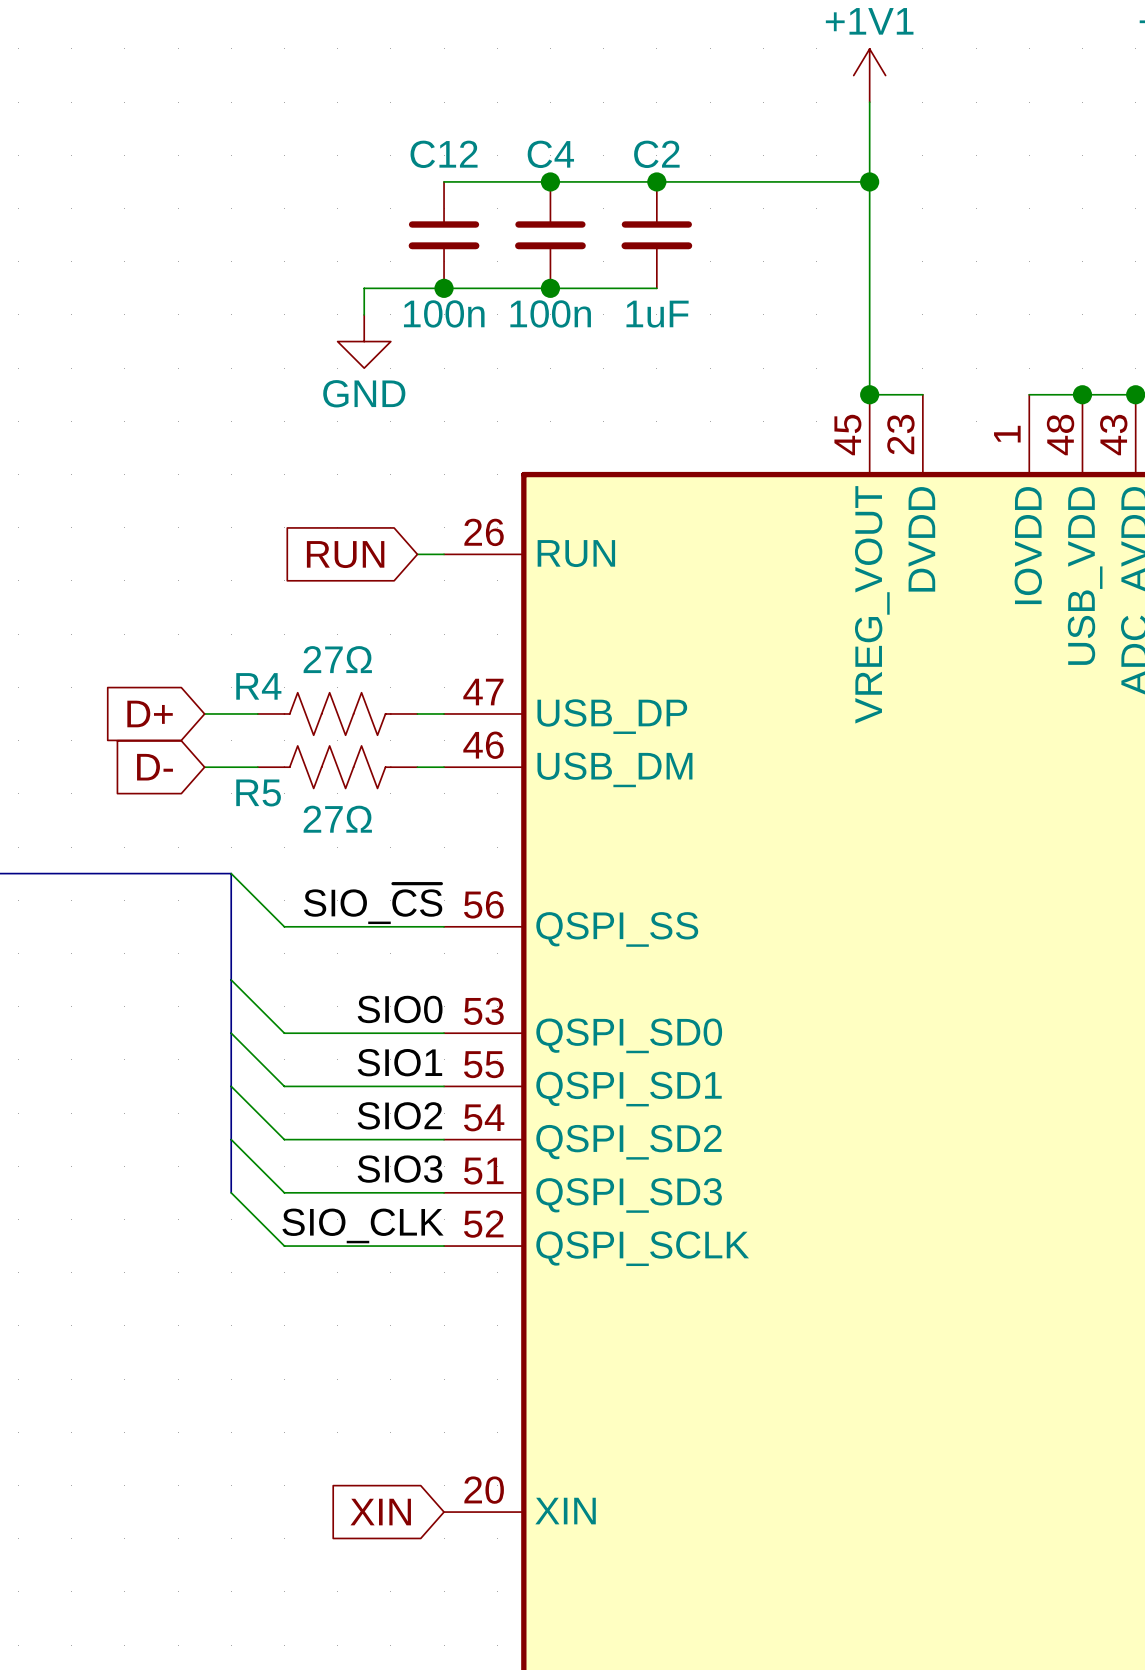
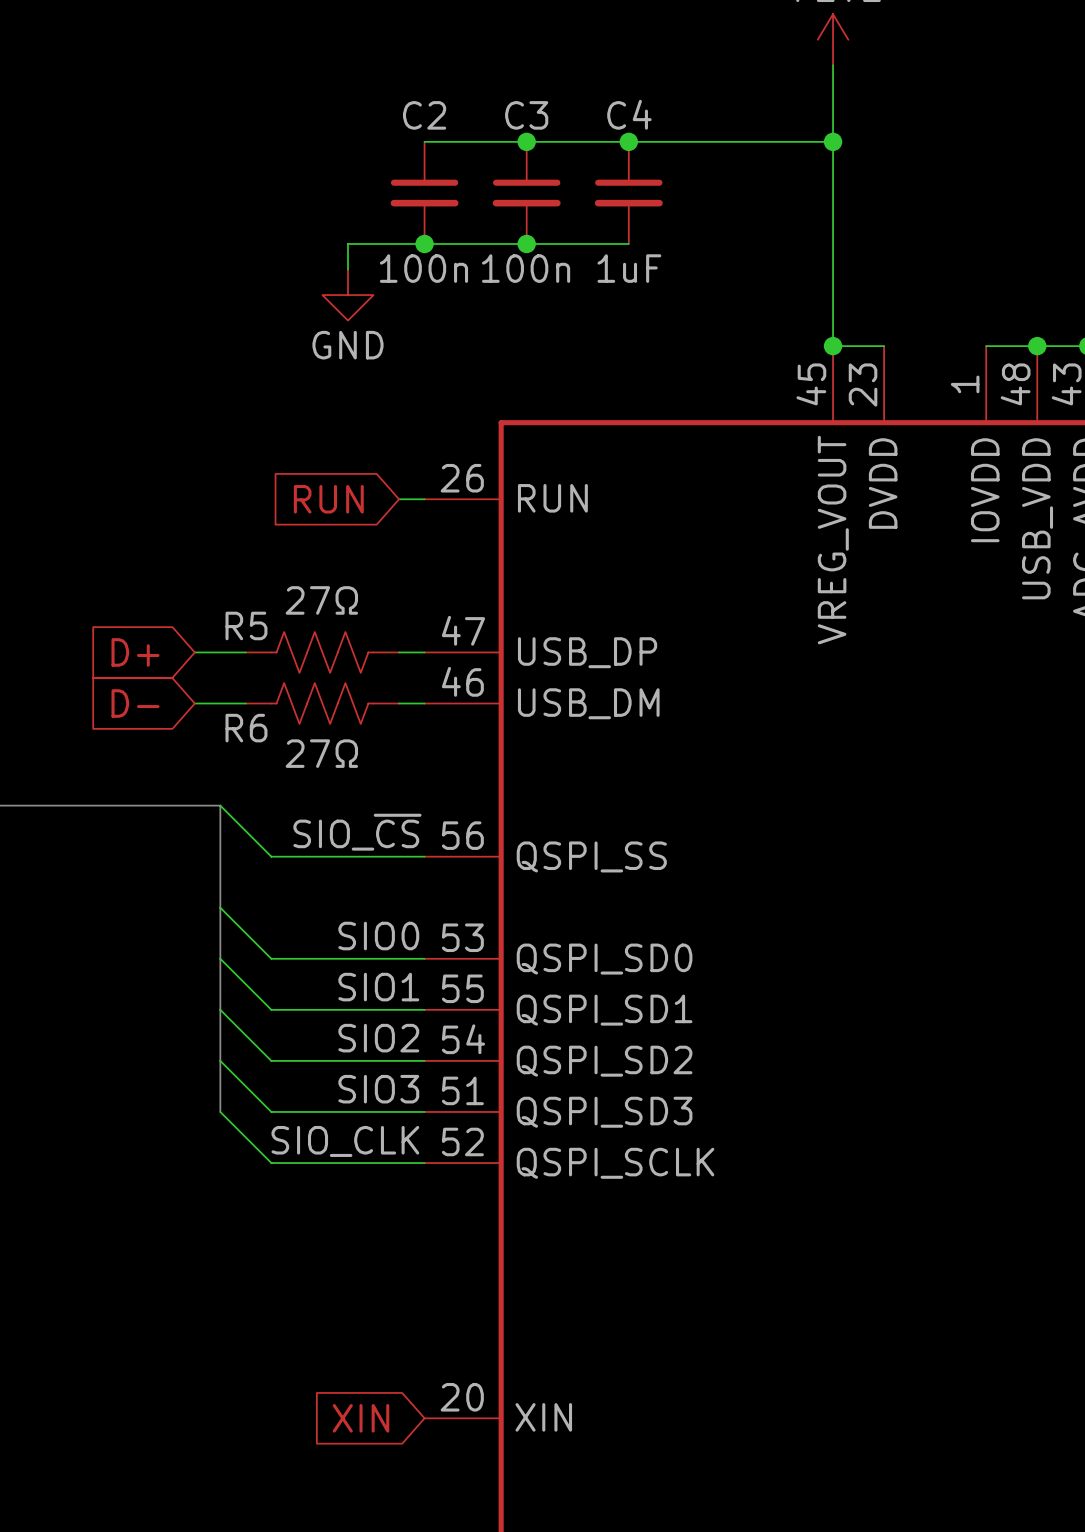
C12 name: C12 (444, 154) -> C2 (424, 115)
C4 name: C4 (550, 154) -> C3 (526, 115)
C2 name: C2 (656, 154) -> C4 (629, 114)
R4 name: R4 (258, 686) -> R5 (246, 625)
R5 name: R5 (258, 792) -> R6 (246, 728)

